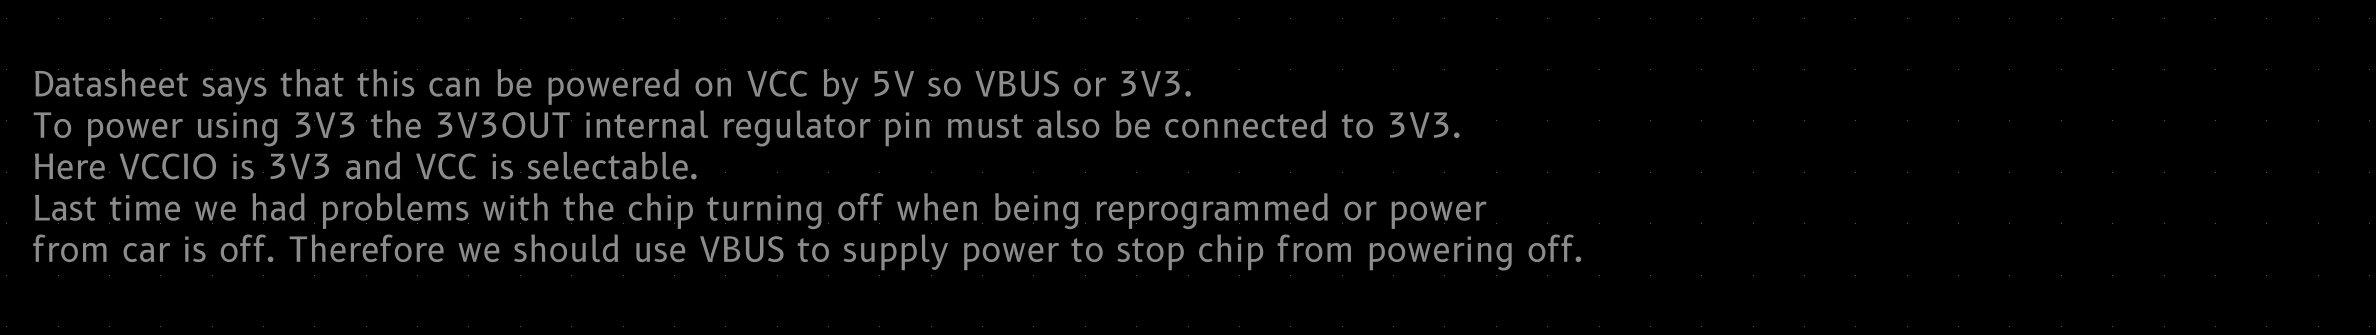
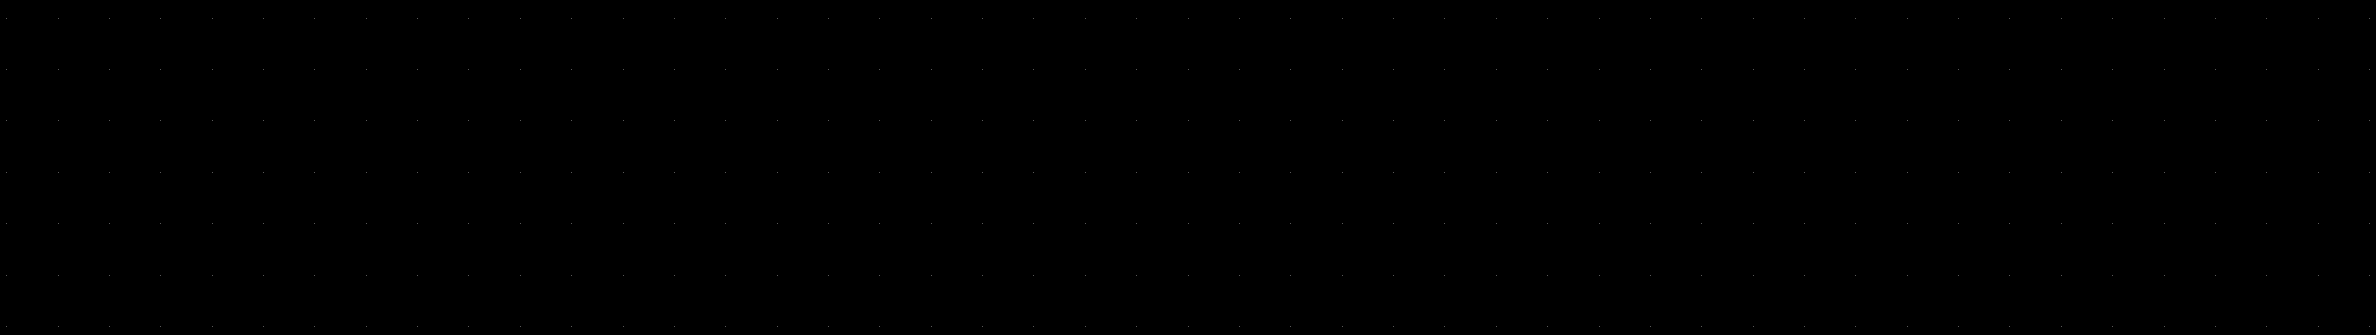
text: Datasheet says that this can be powered on VCC by 5V so VBUS or 3V3. (613, 86) -> none
text: To power using 3V3 the 3V3OUT internal regulator pin must also be connected to 3V3. (746, 128) -> none
text: Here VCCIO is 3V3 and VCC is selectable. (365, 165) -> none
text: Last time we had problems with the chip turning off when being reprogrammed or power (760, 211) -> none
text: from car is off. Therefore we should use VBUS to supply power to stop chip from powering off. (807, 252) -> none

